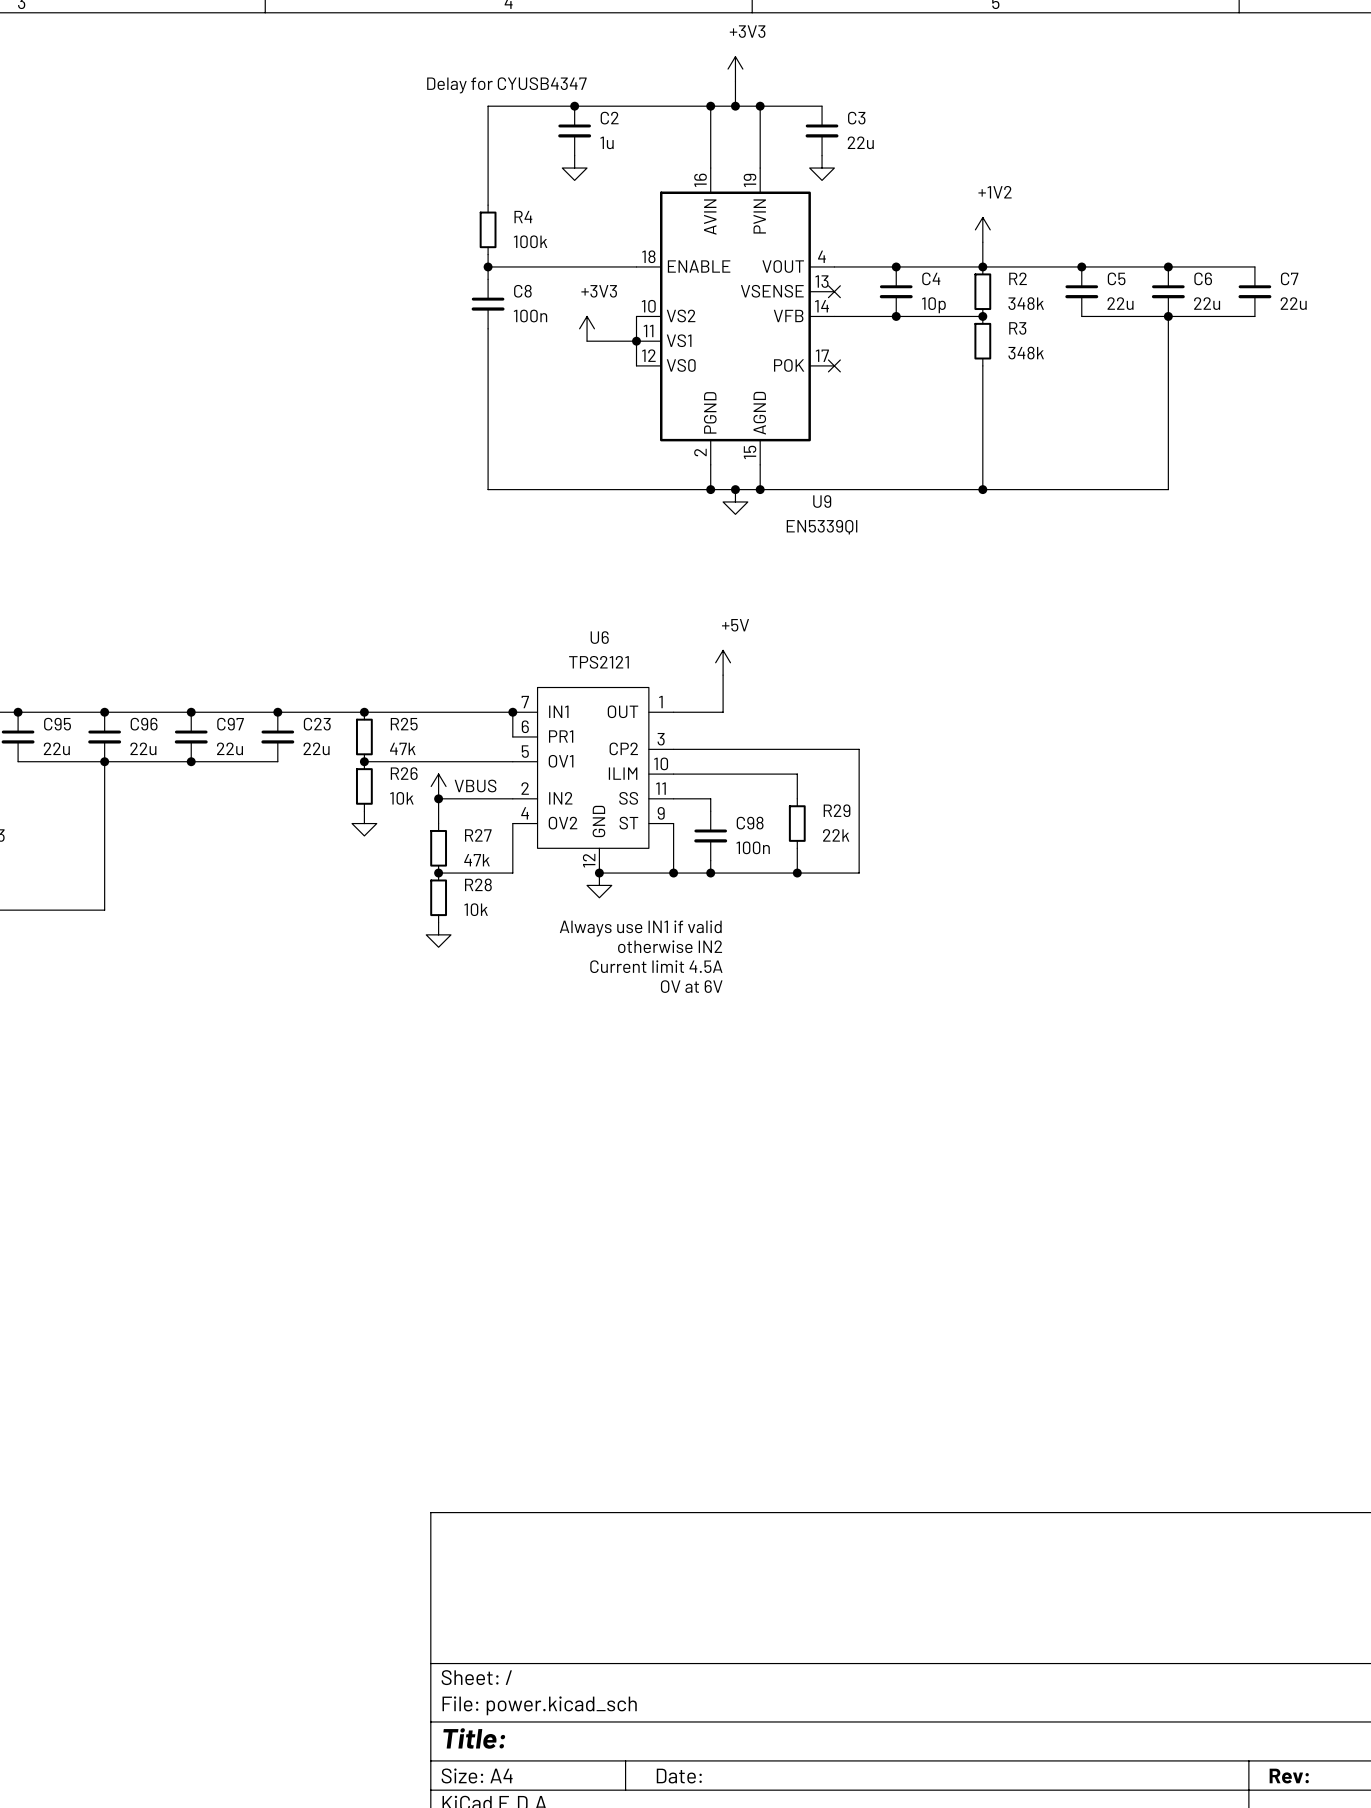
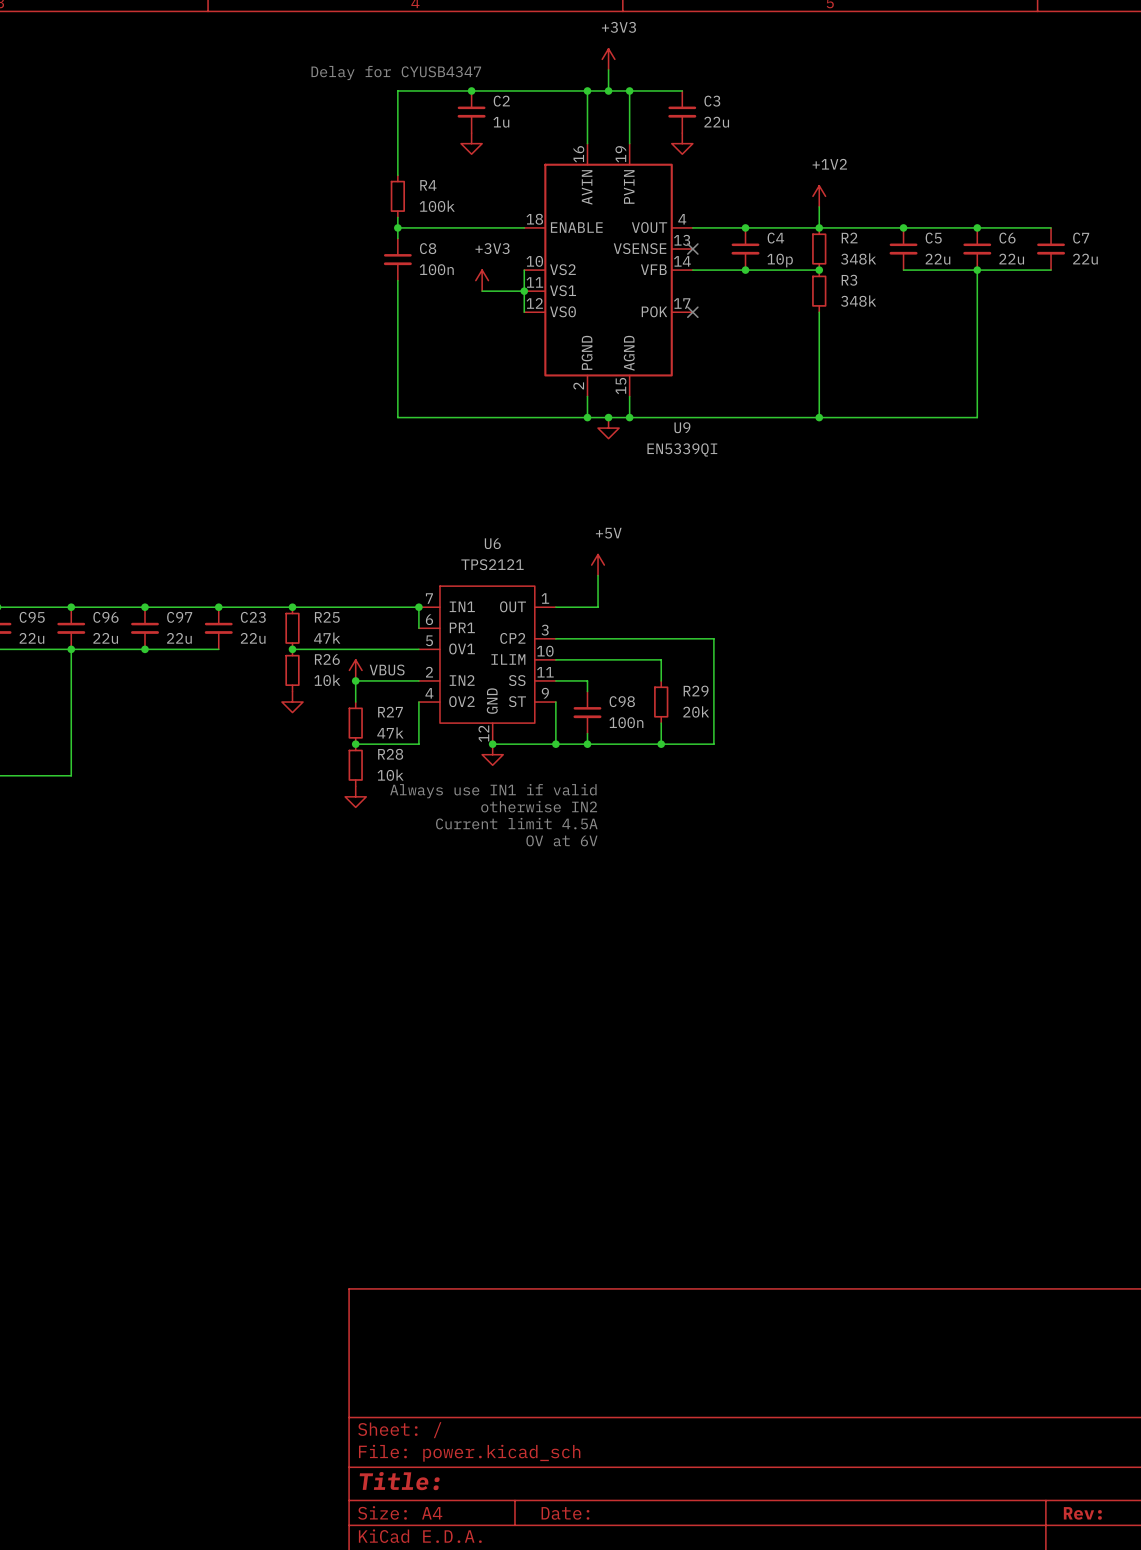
R29 value: 22k (836, 835) -> 20k (696, 711)

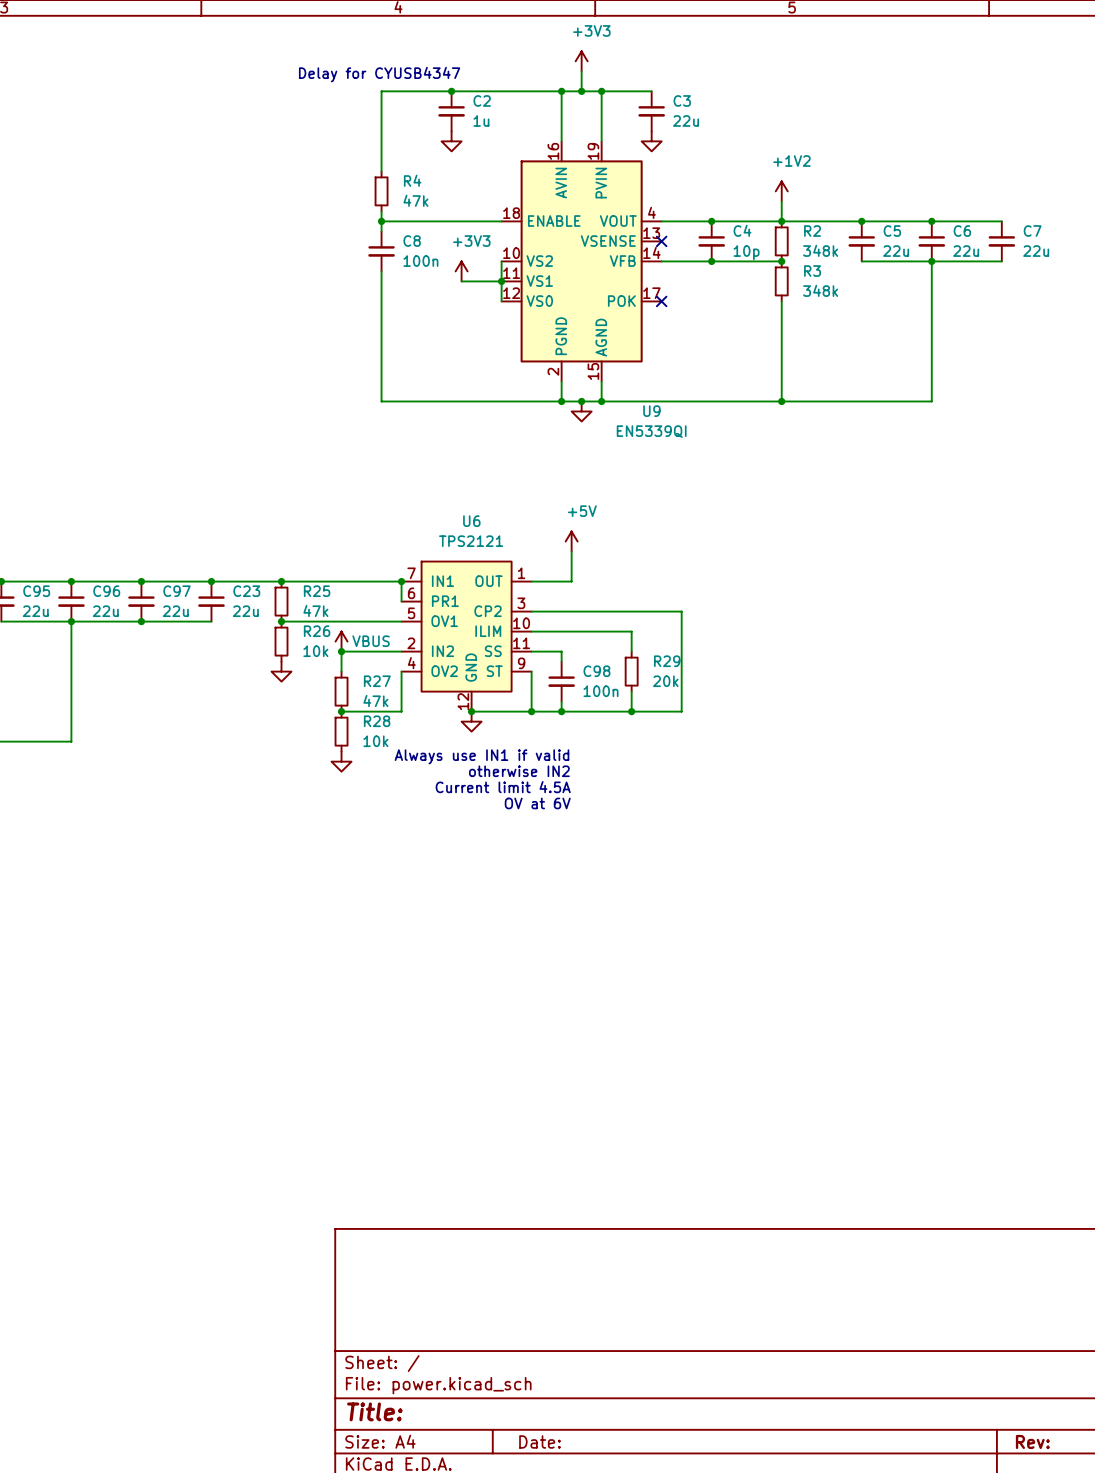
R4 value: 100k (437, 206) -> 47k (415, 200)

